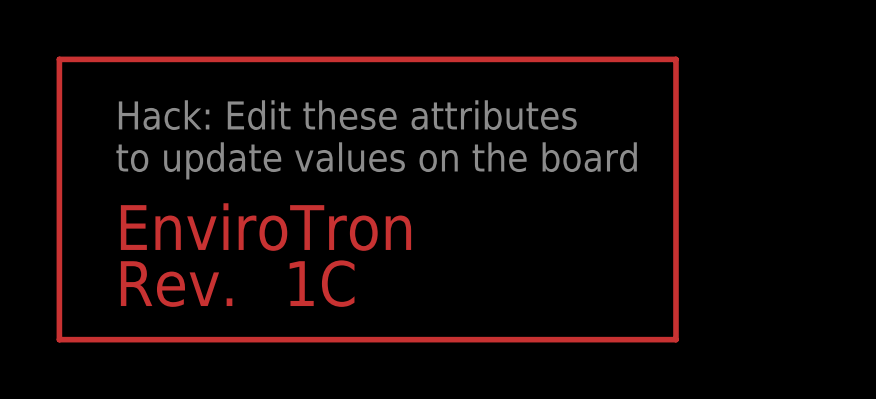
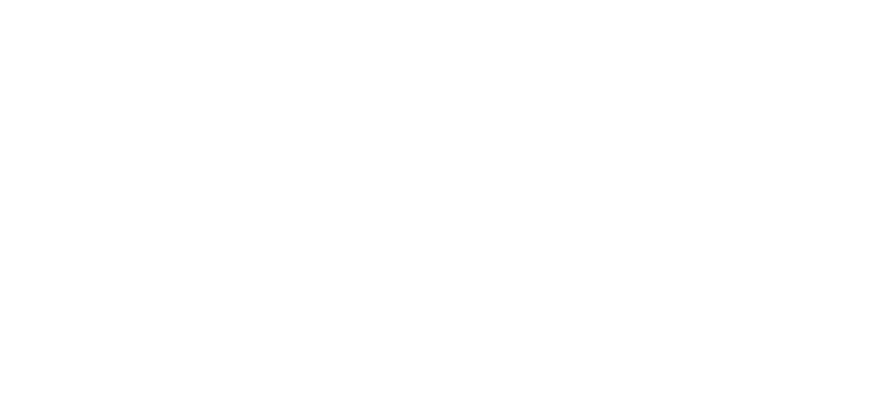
part: (367, 199) -> none

